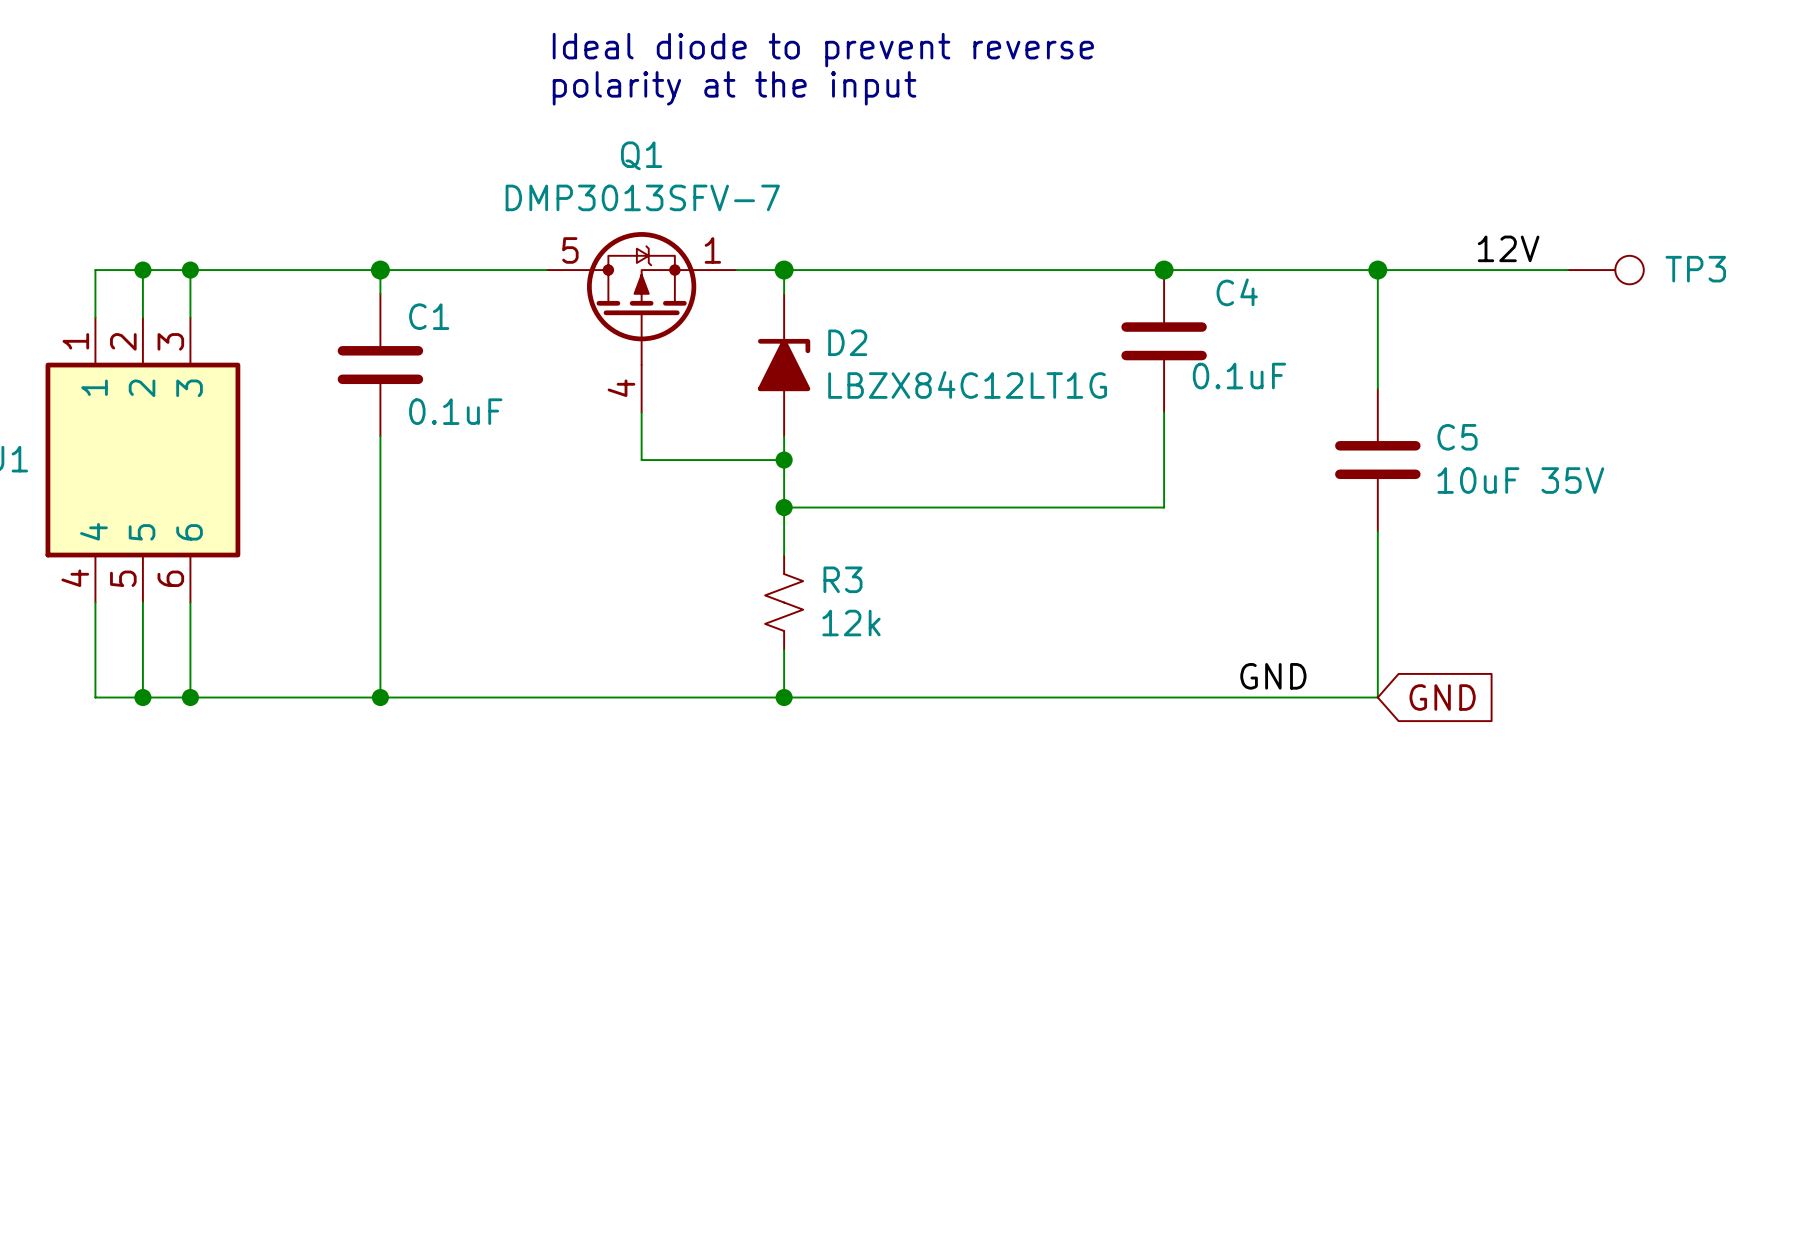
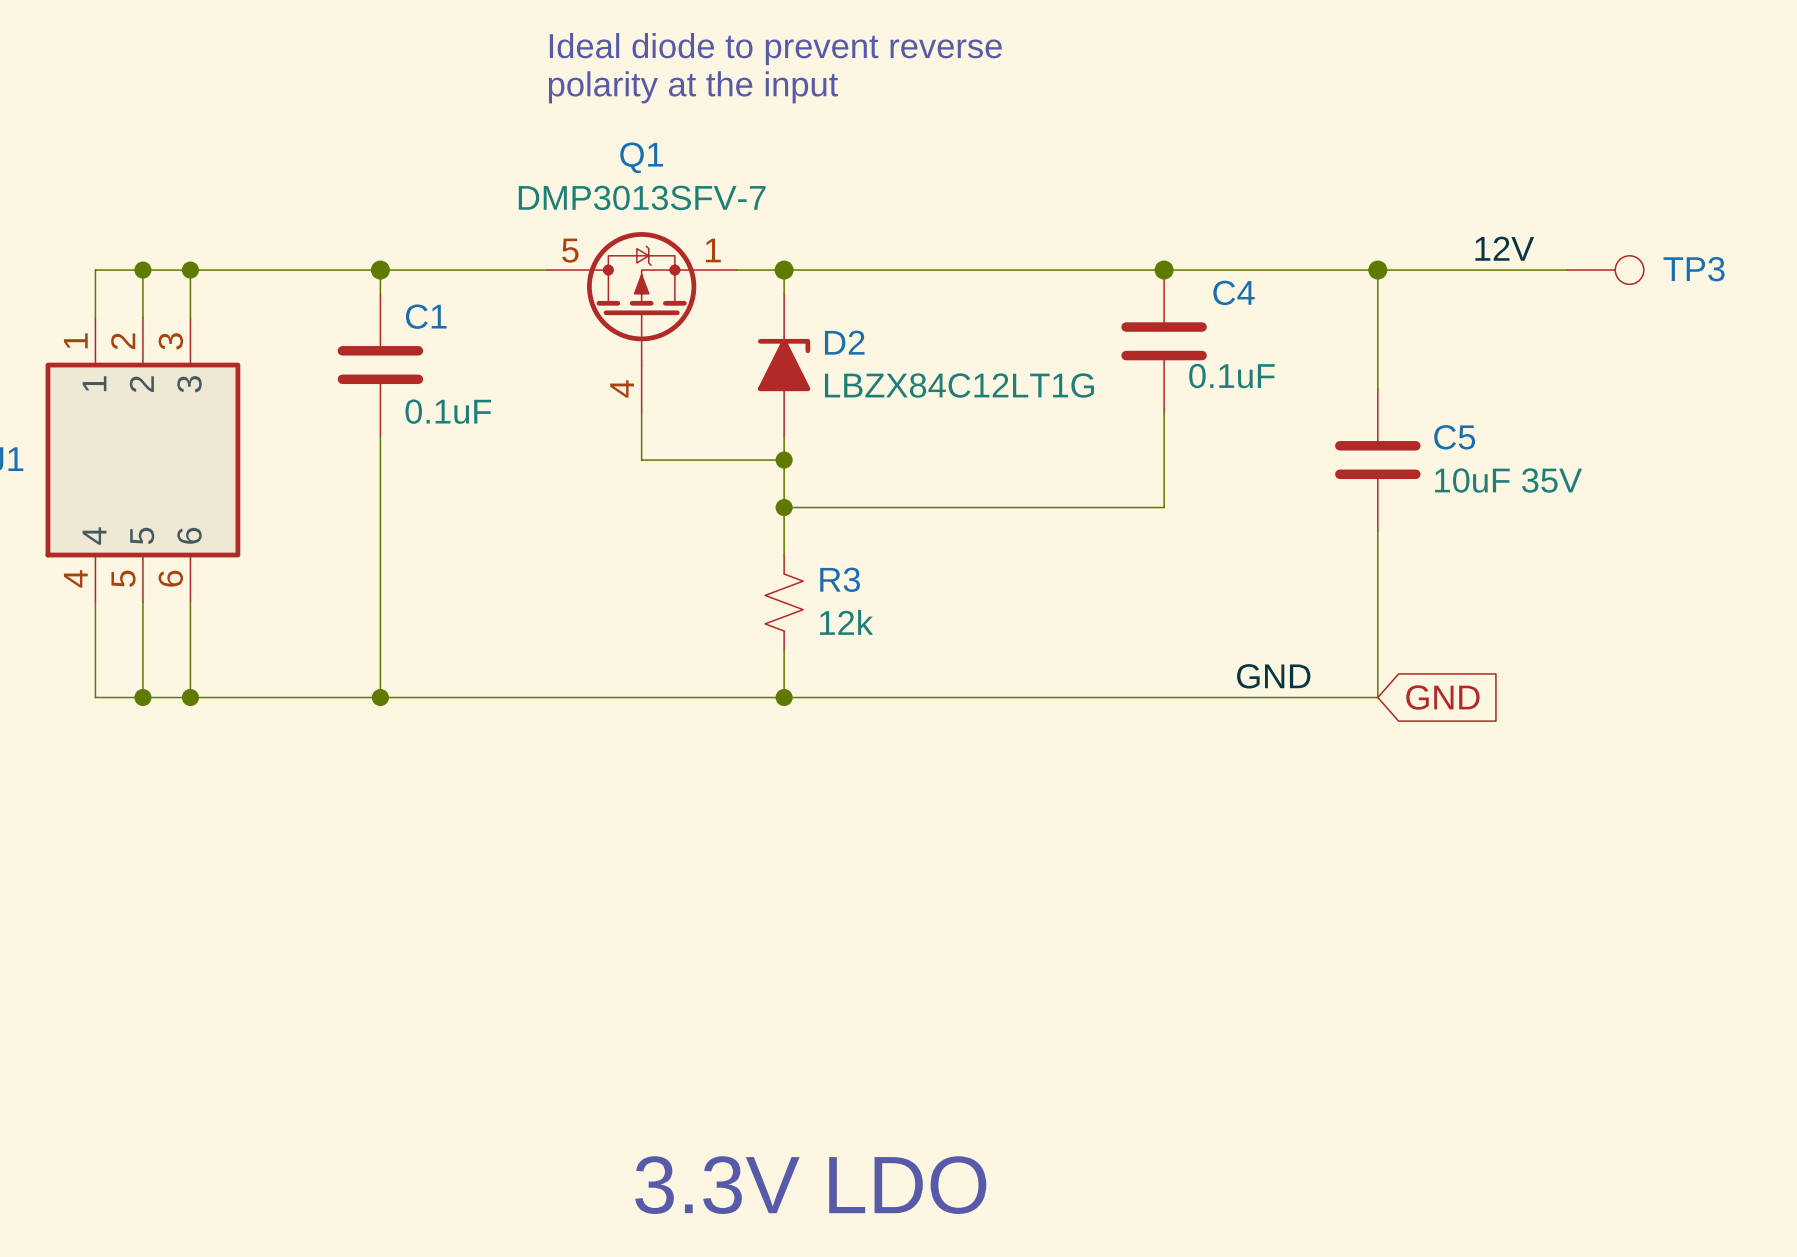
text: none -> 3.3V LDO (810, 1185)

